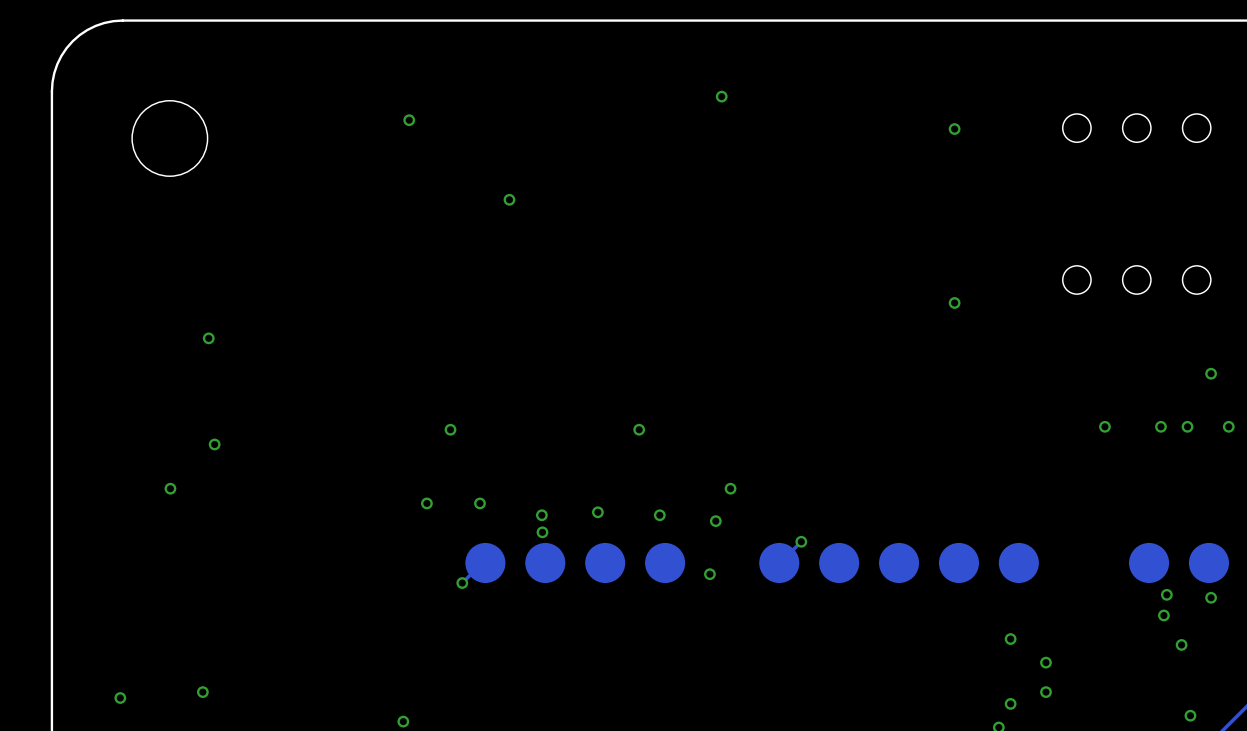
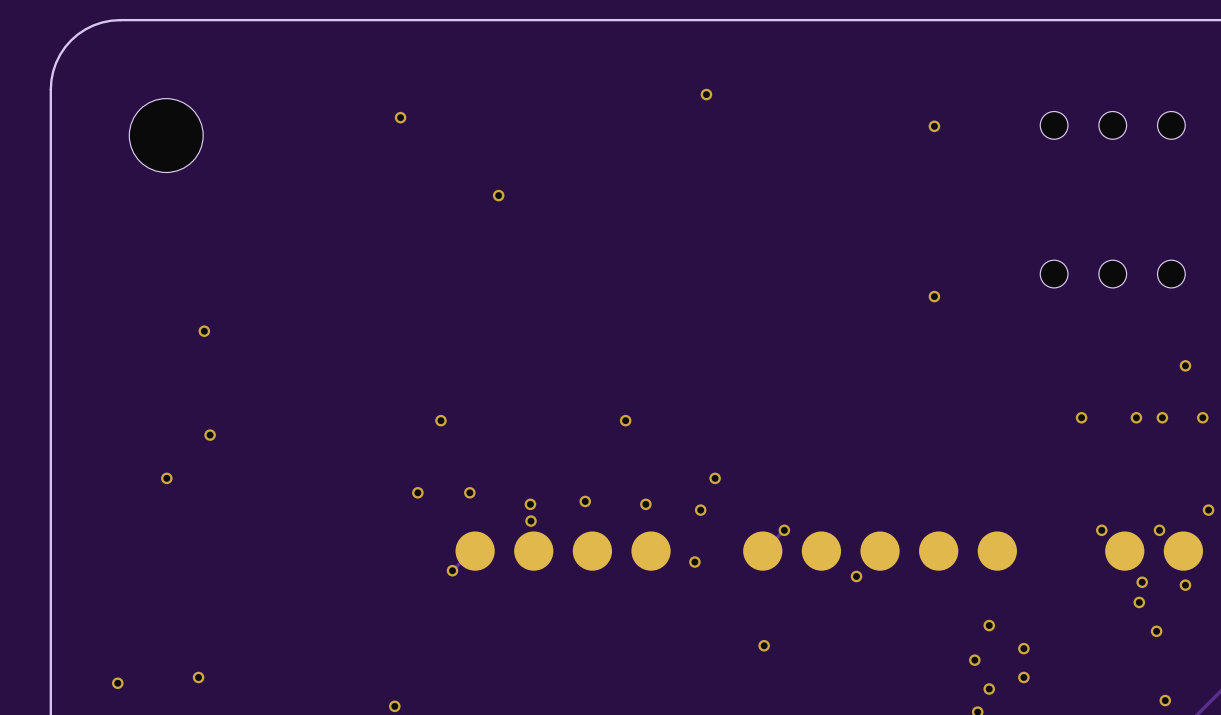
via: none -> (1208, 510)
via: none -> (1101, 530)
via: none -> (1159, 530)
via: none -> (856, 576)
via: none -> (764, 645)
via: none -> (974, 660)

